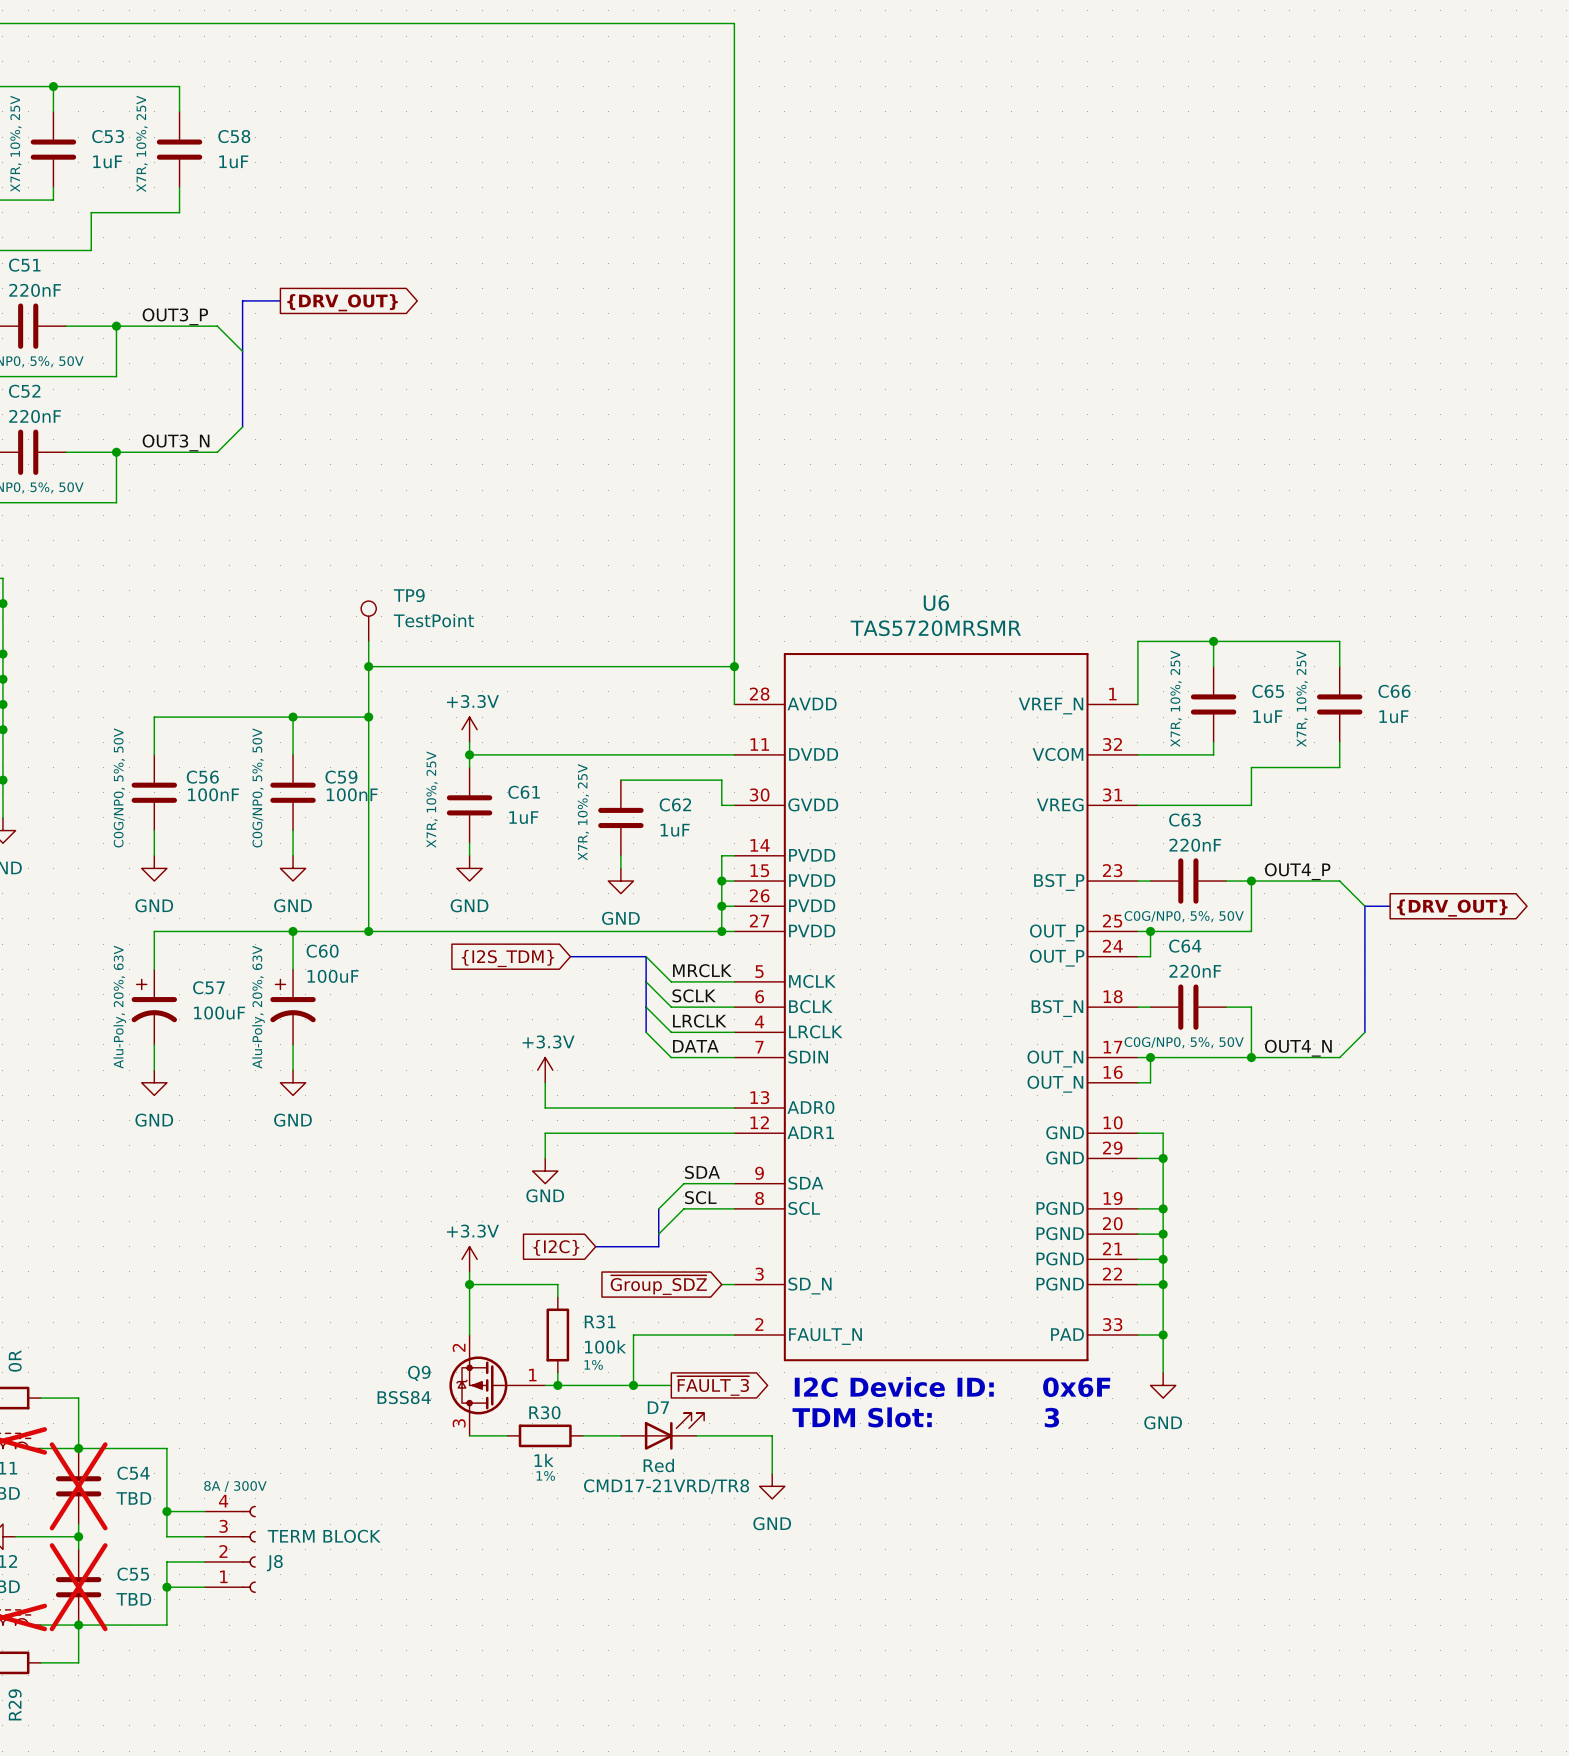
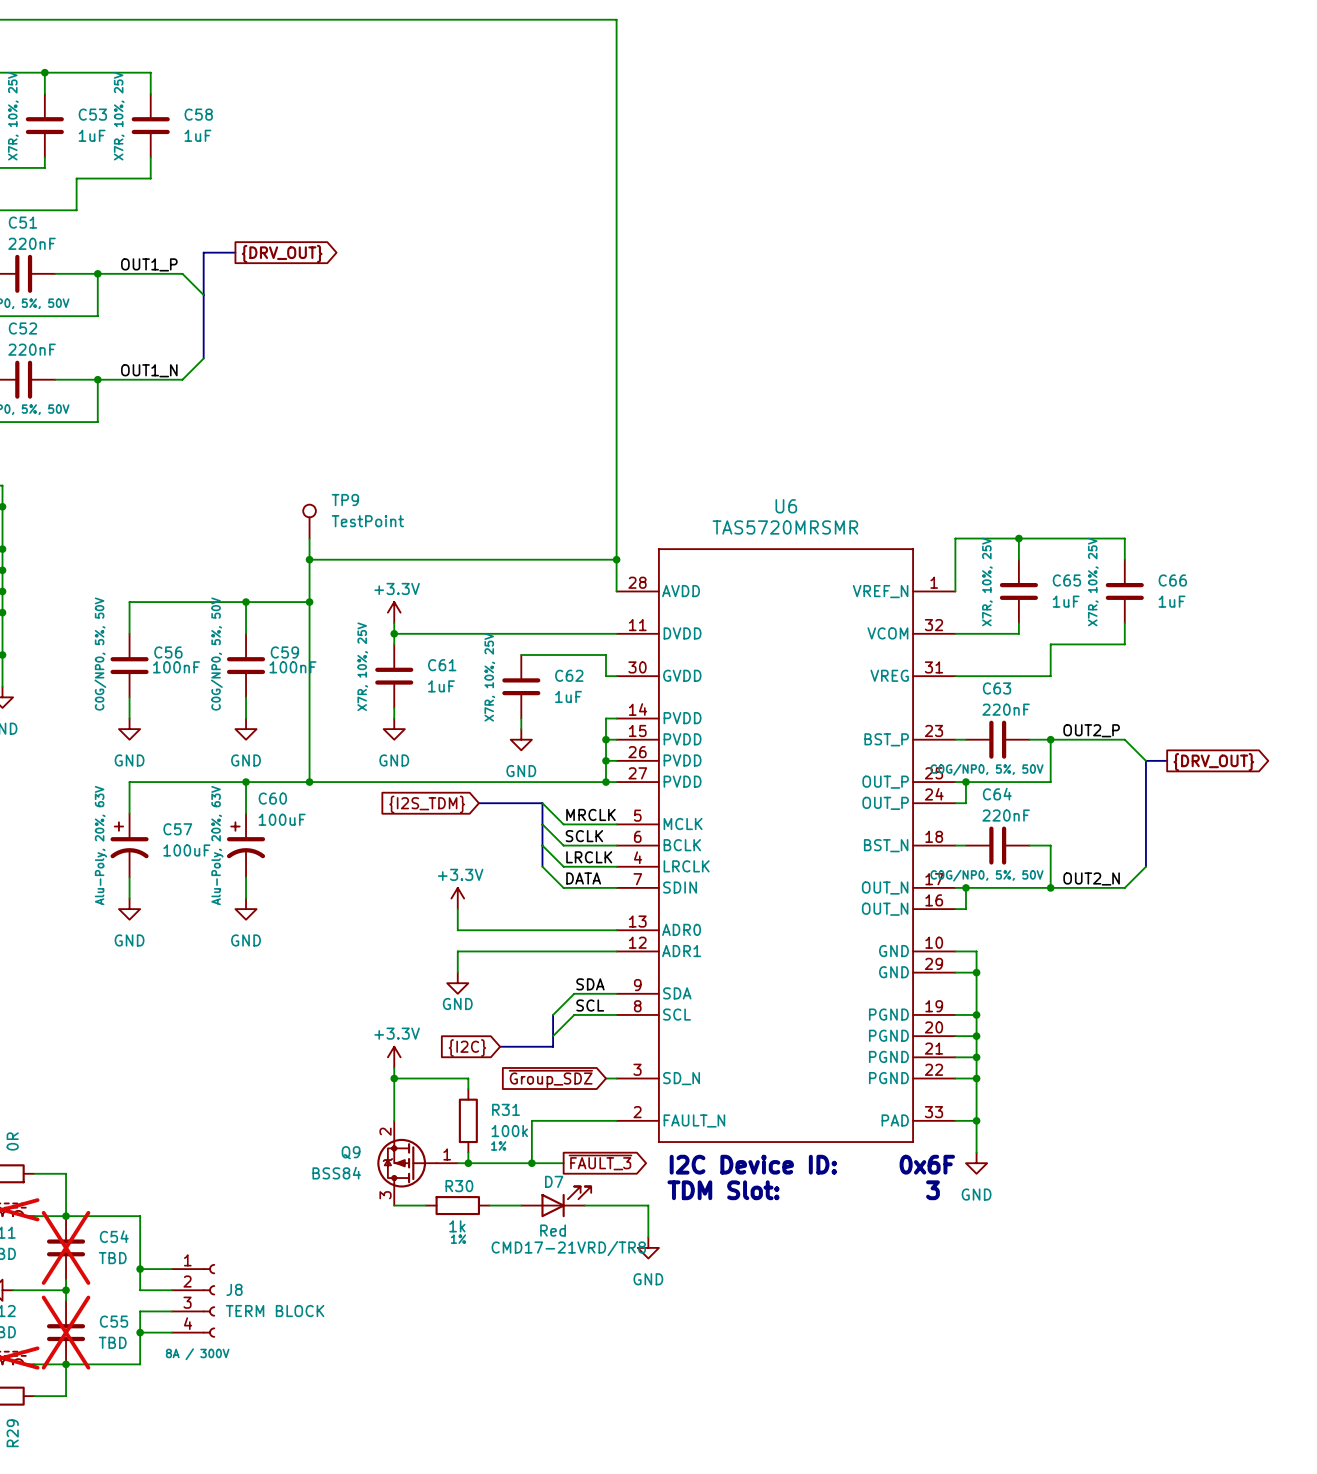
label: OUT3_P (175, 316) -> OUT1_P (149, 264)
label: OUT3_N (176, 442) -> OUT1_N (149, 370)
label: OUT4_P (1297, 871) -> OUT2_P (1091, 730)
label: OUT4_N (1298, 1048) -> OUT2_N (1091, 878)
J8 flip: as is (248, 1549) -> up-down (208, 1300)

